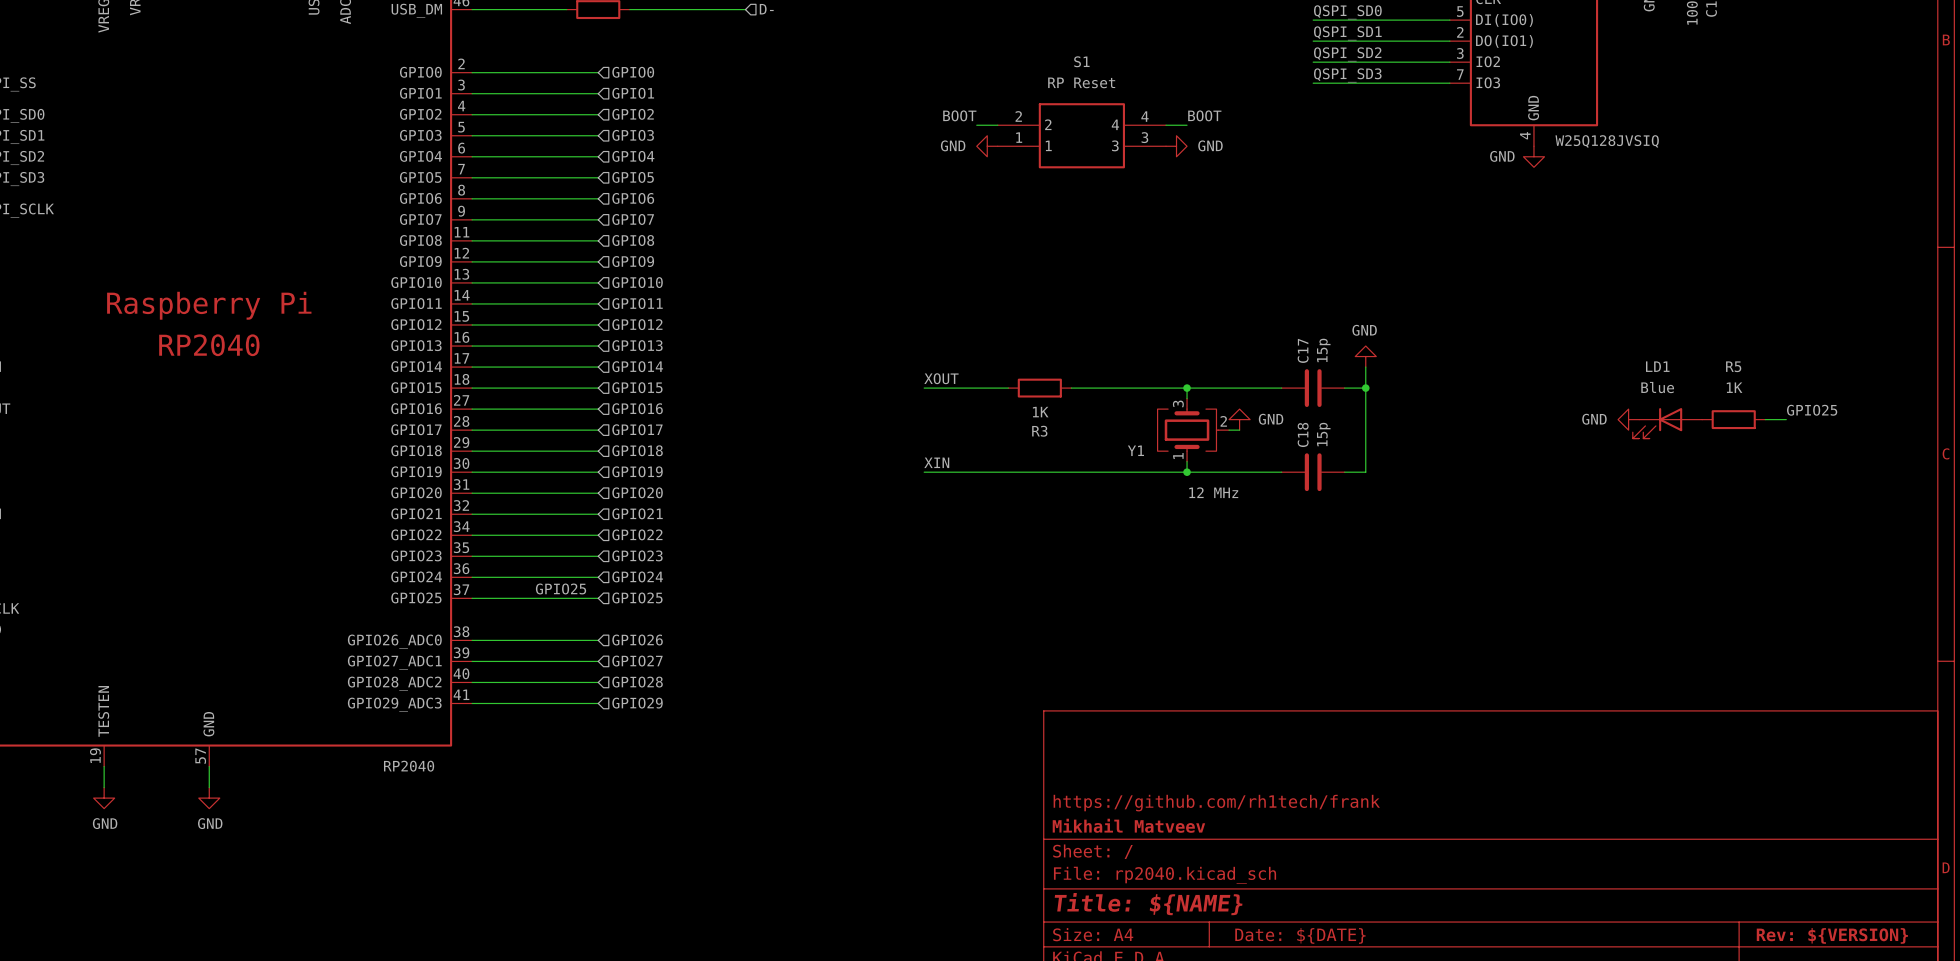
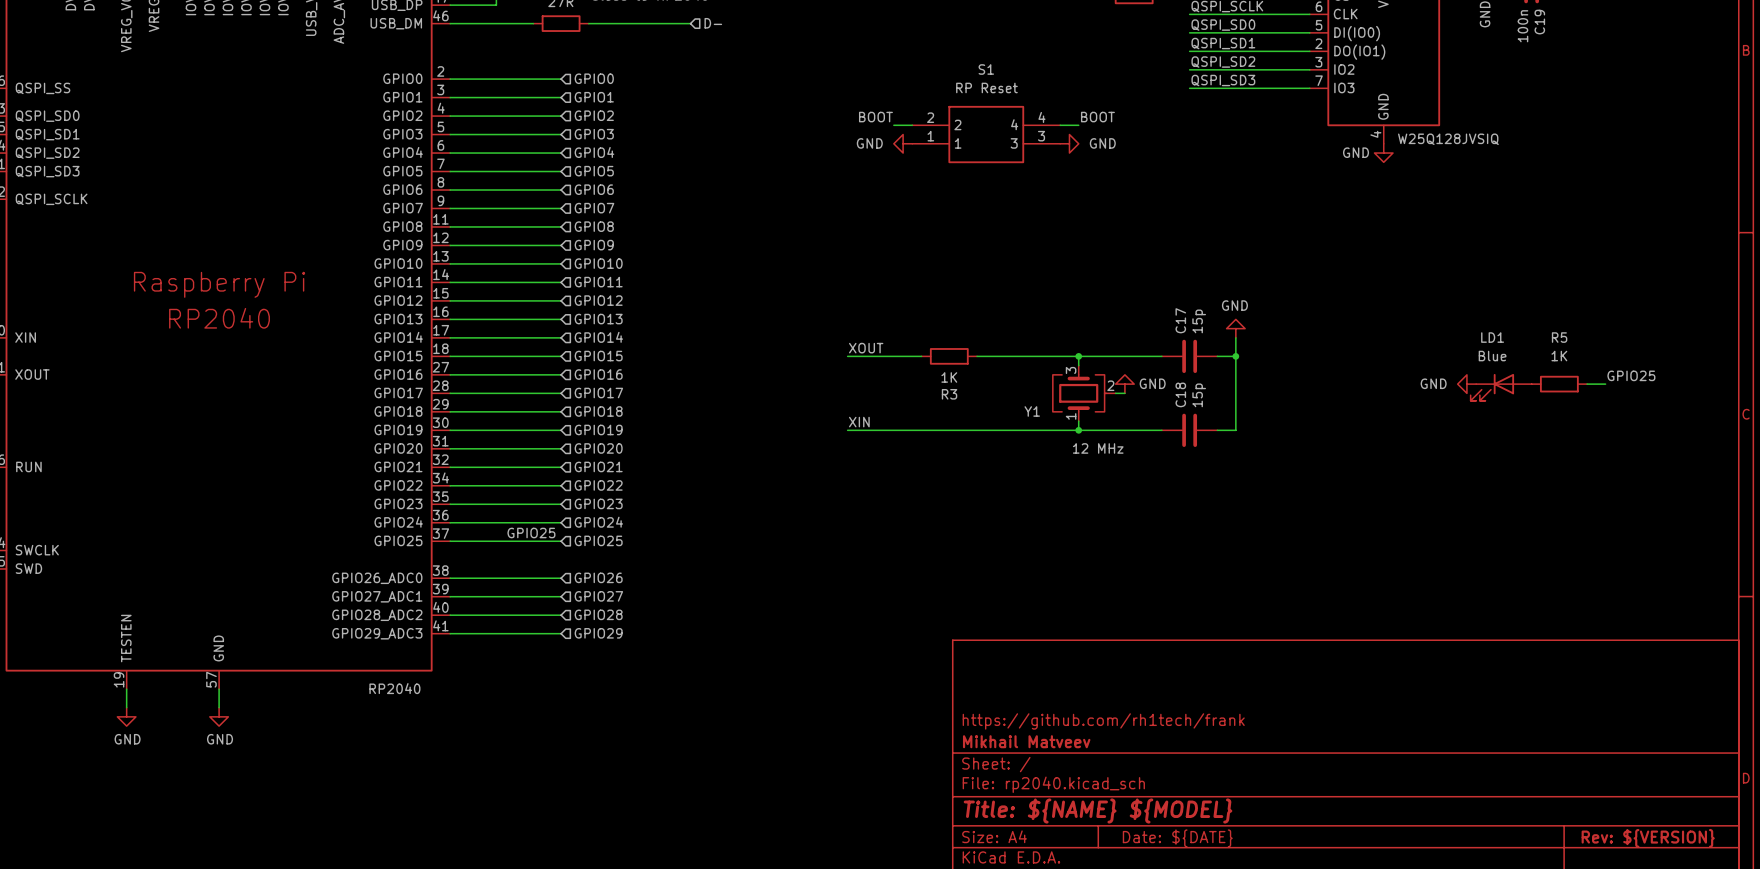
title block: Title: ${NAME} (1148, 904) -> Title: ${NAME} ${MODEL} (1098, 811)

